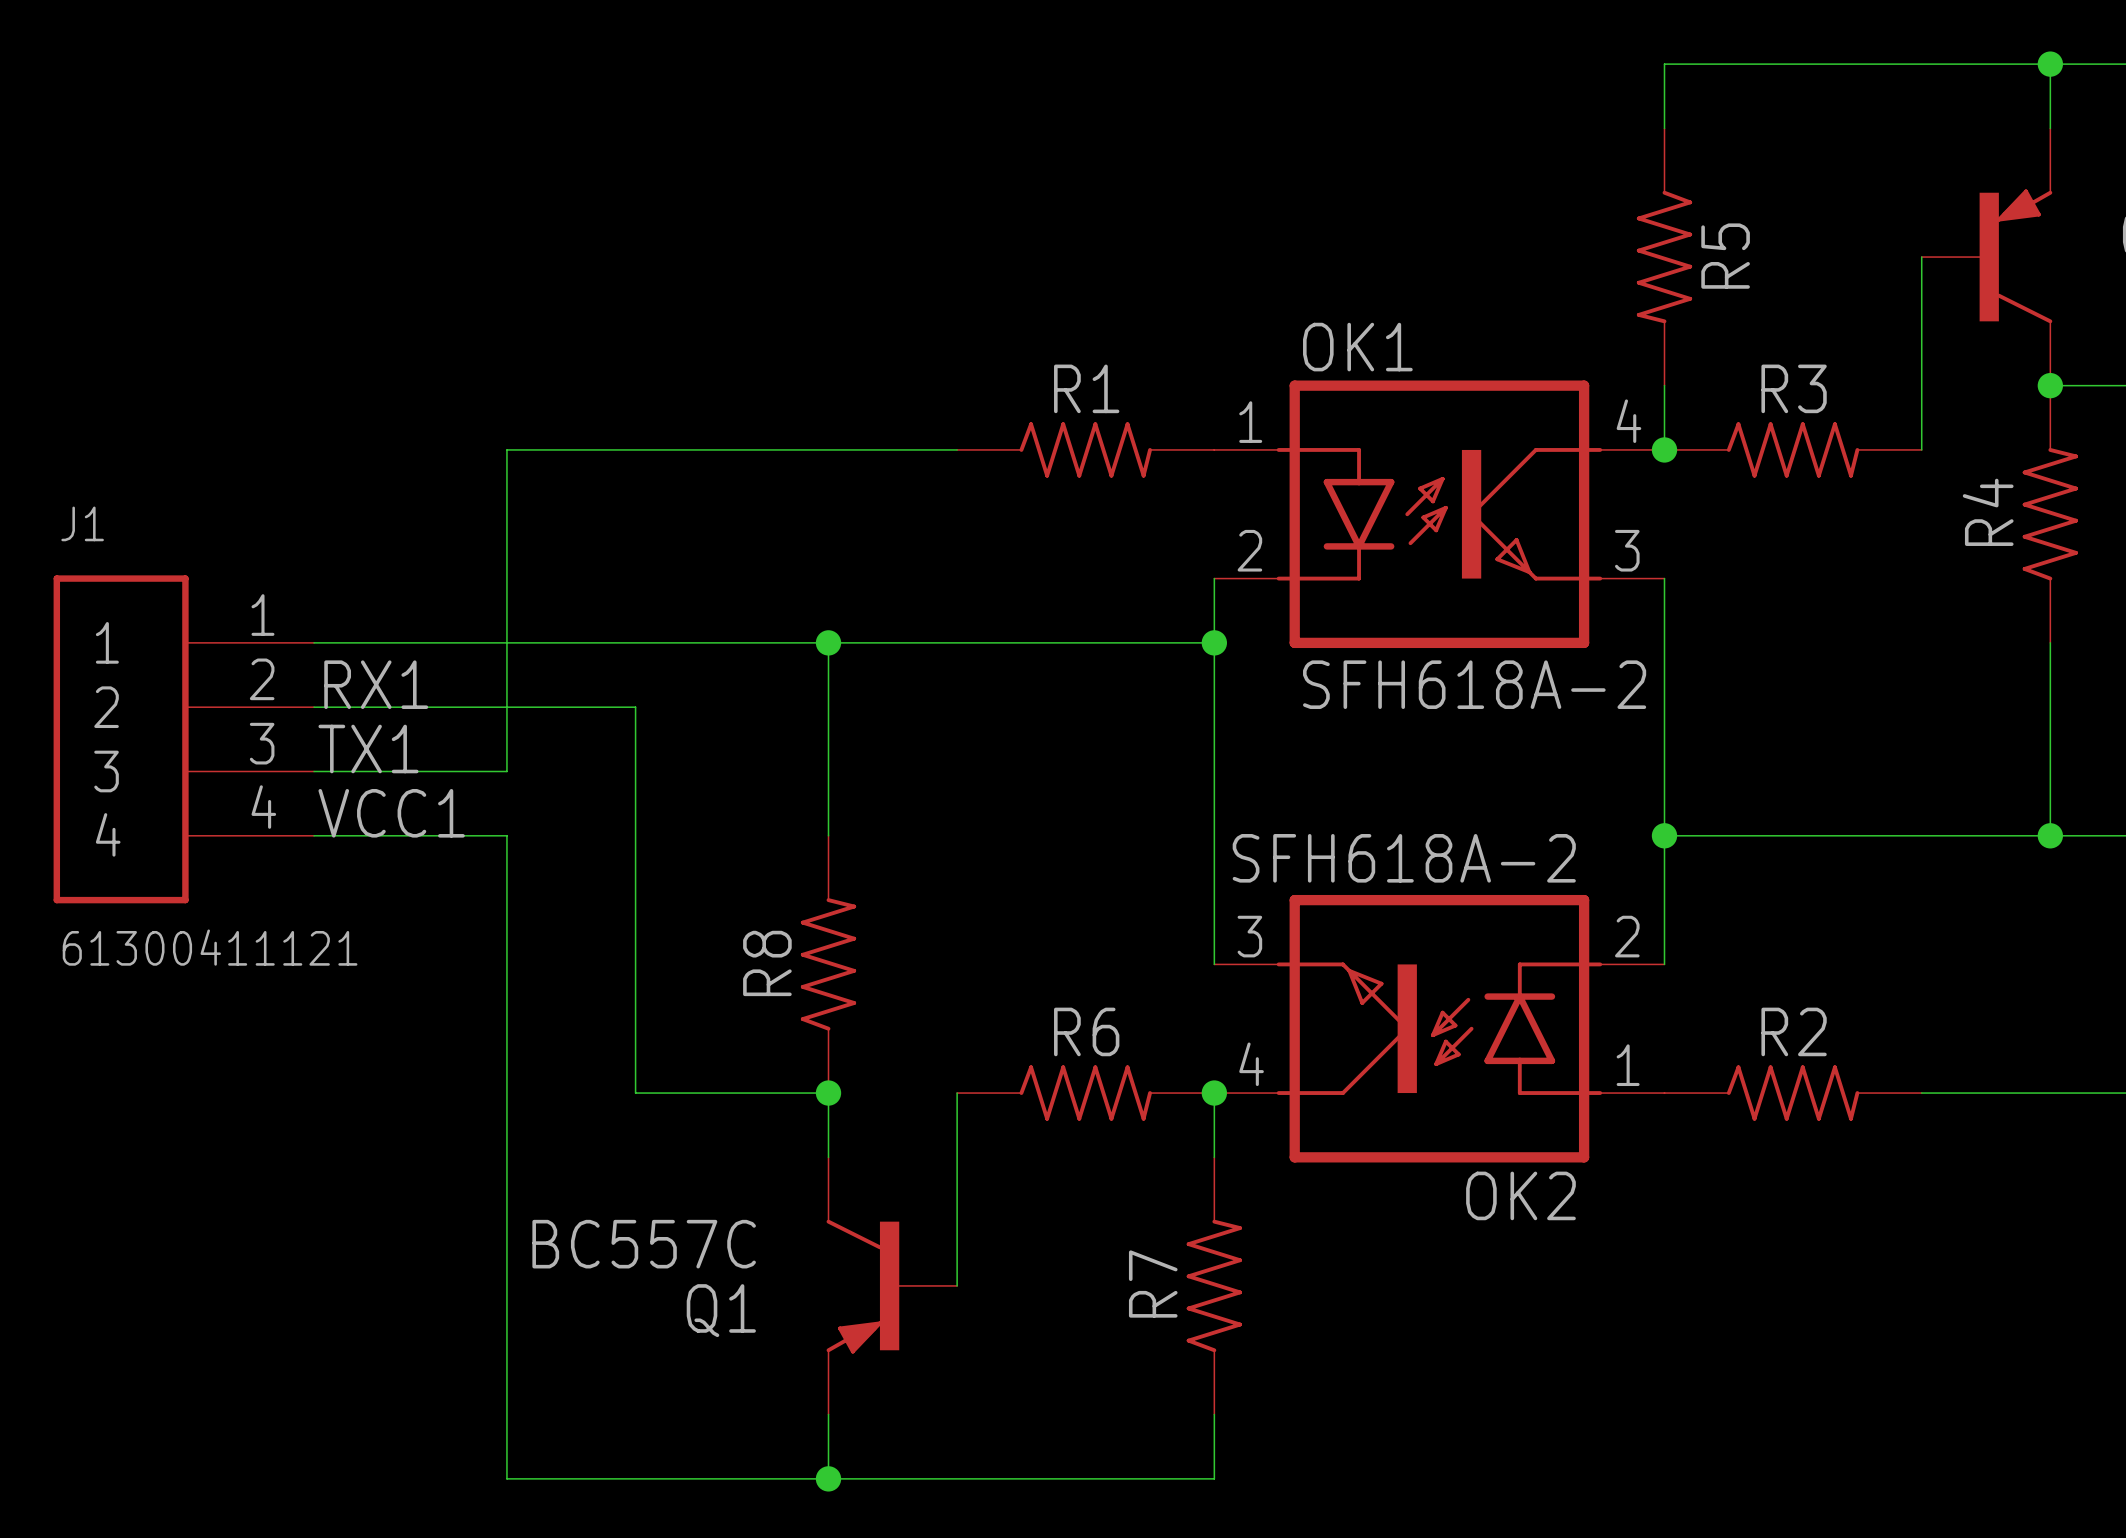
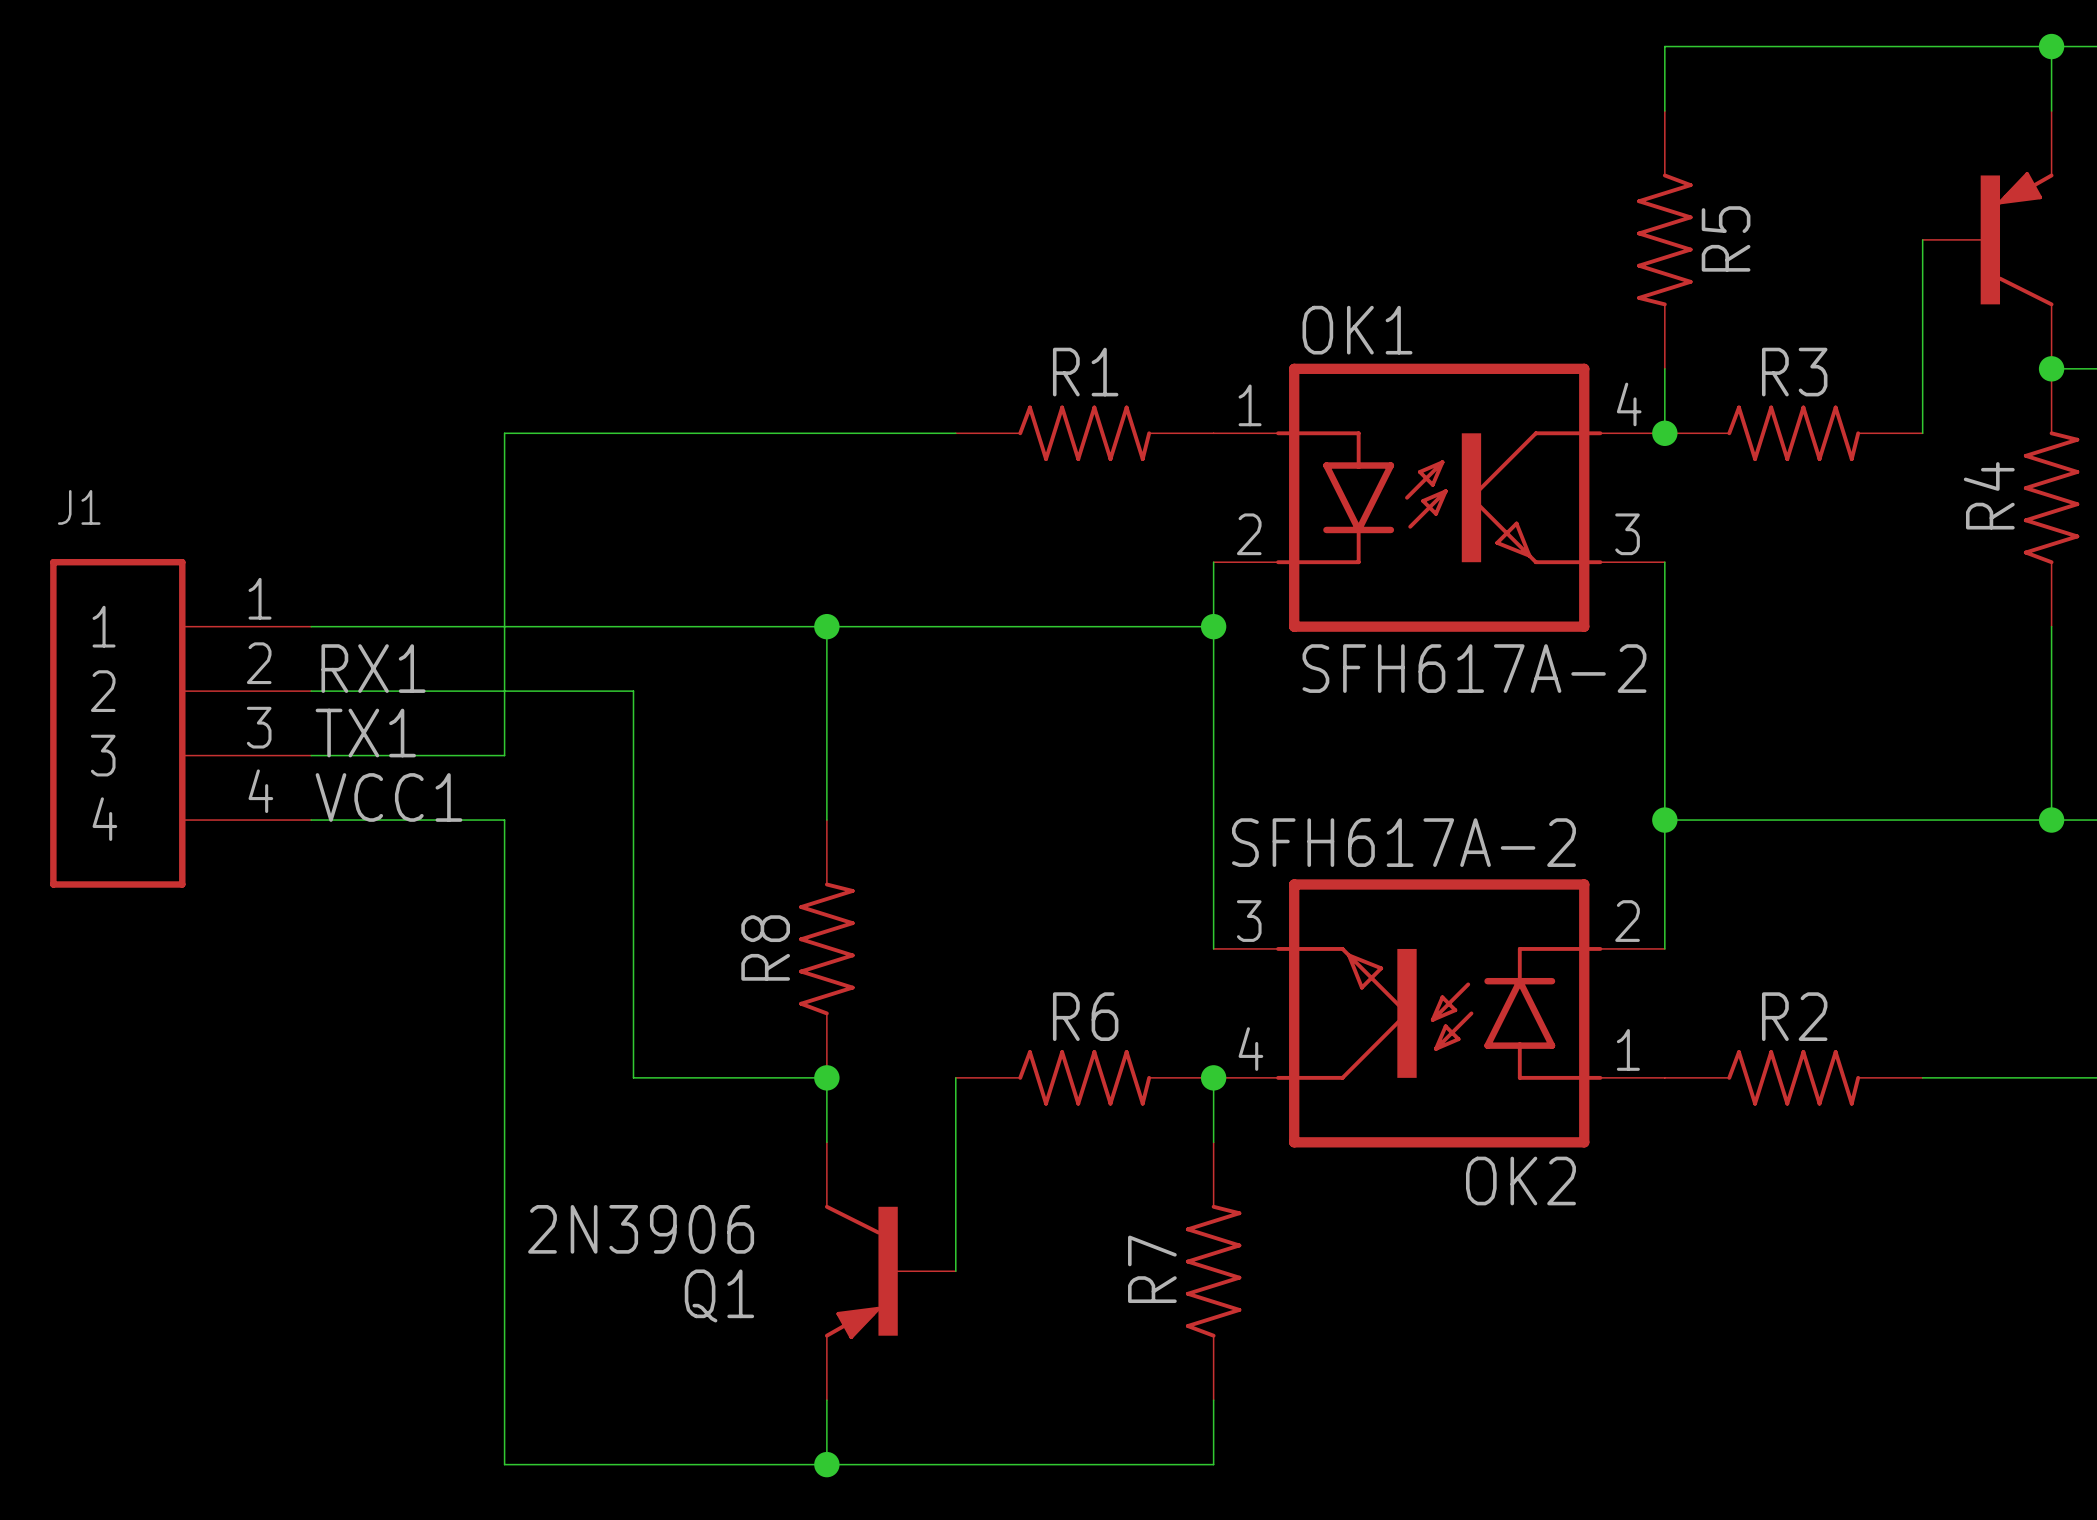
OK1 value: SFH618A-2 (1474, 684) -> SFH617A-2 (1474, 668)
OK2 value: SFH618A-2 (1404, 858) -> SFH617A-2 (1403, 842)
J1 value: 61300411121 (210, 947) -> none
Q1 value: BC557C (644, 1244) -> 2N3906 (641, 1229)

